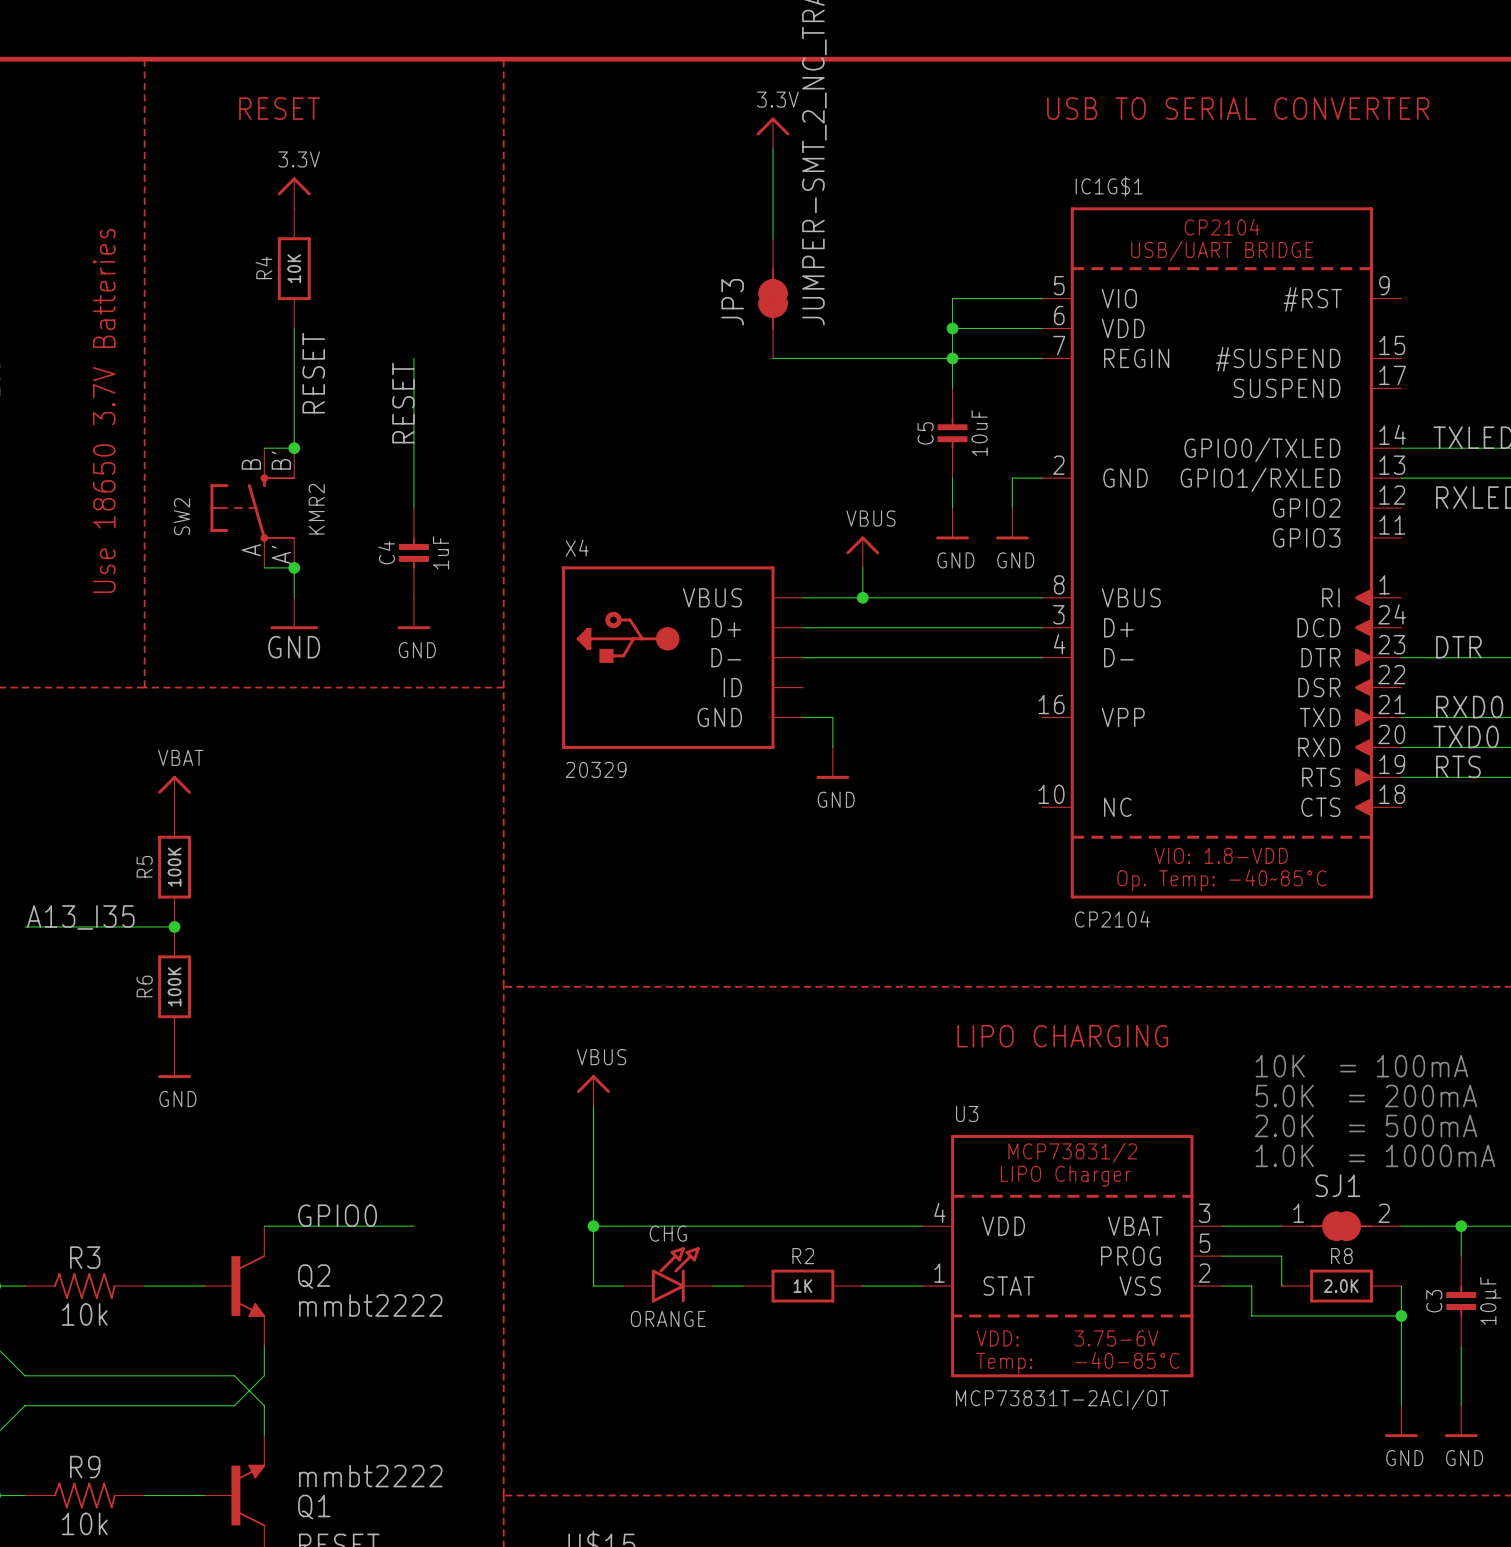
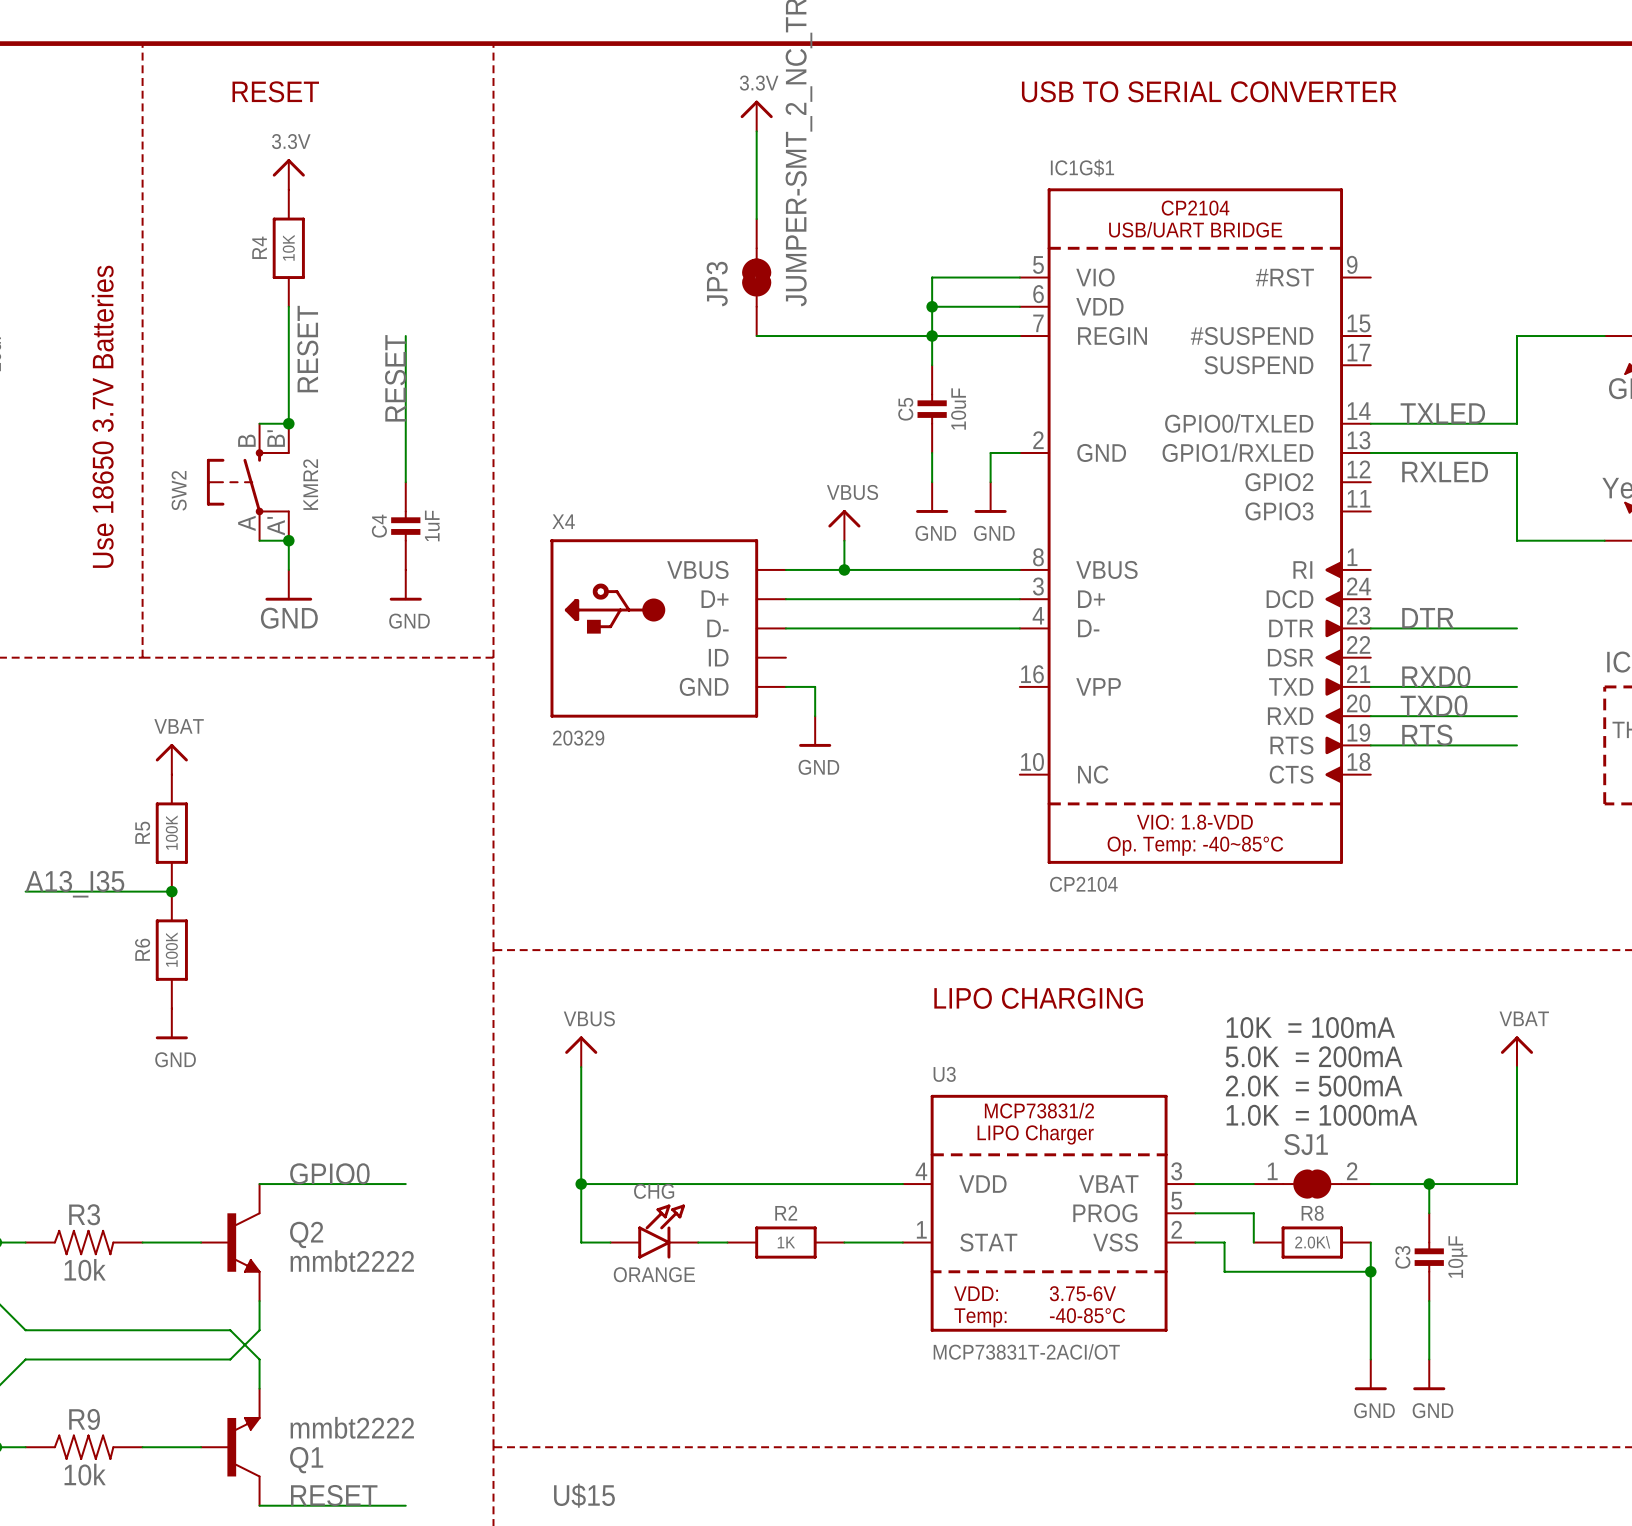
R8 value: 2.0K (1341, 1286) -> 2.0K\ (1312, 1242)

